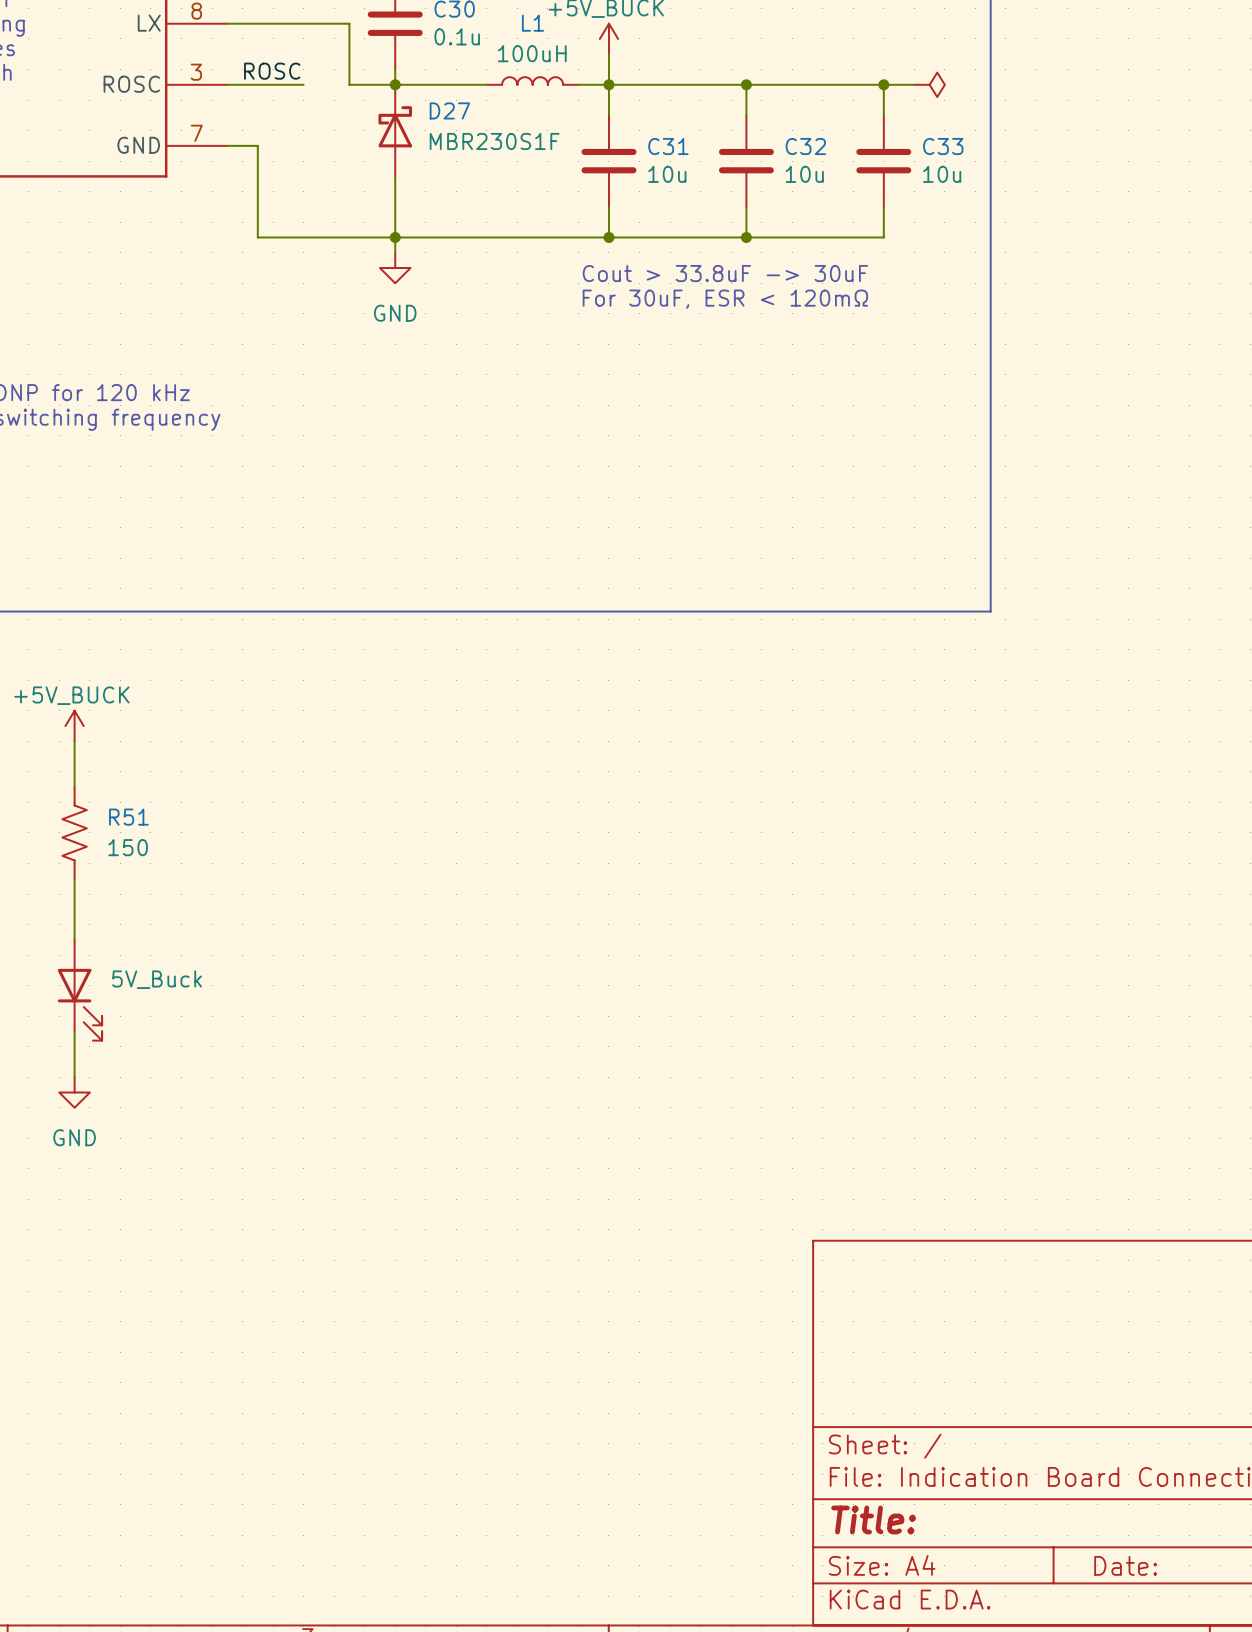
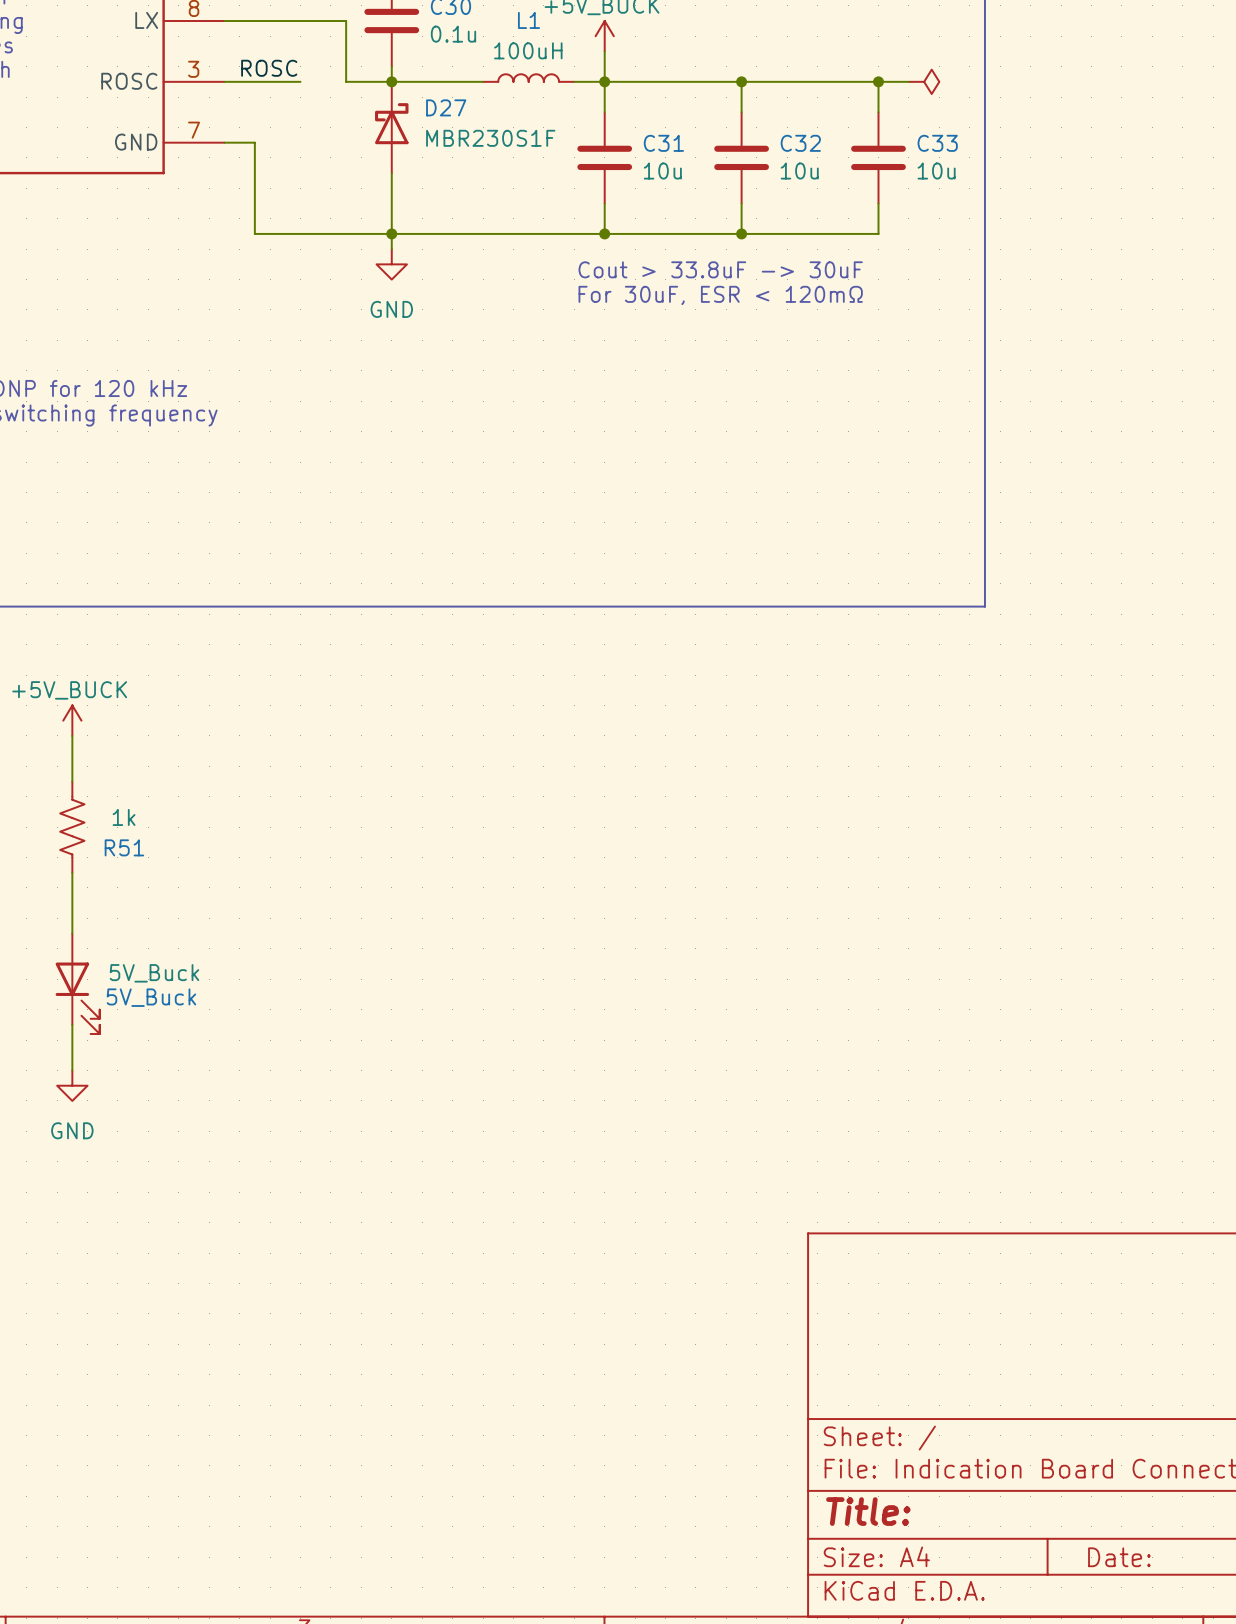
R51 name position: R51 (128, 817) -> R51 (124, 847)
R51 value: 150 (128, 847) -> 1k (124, 817)
5V_Buck name: none -> 5V_Buck (151, 997)

